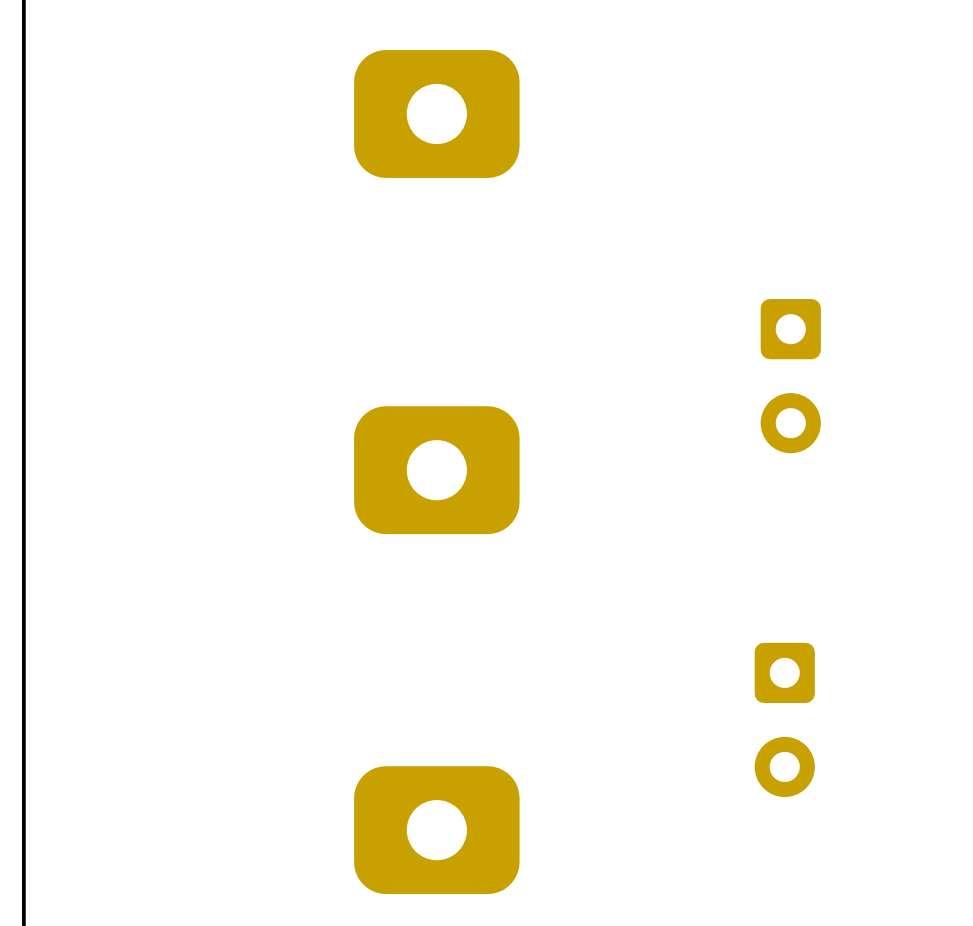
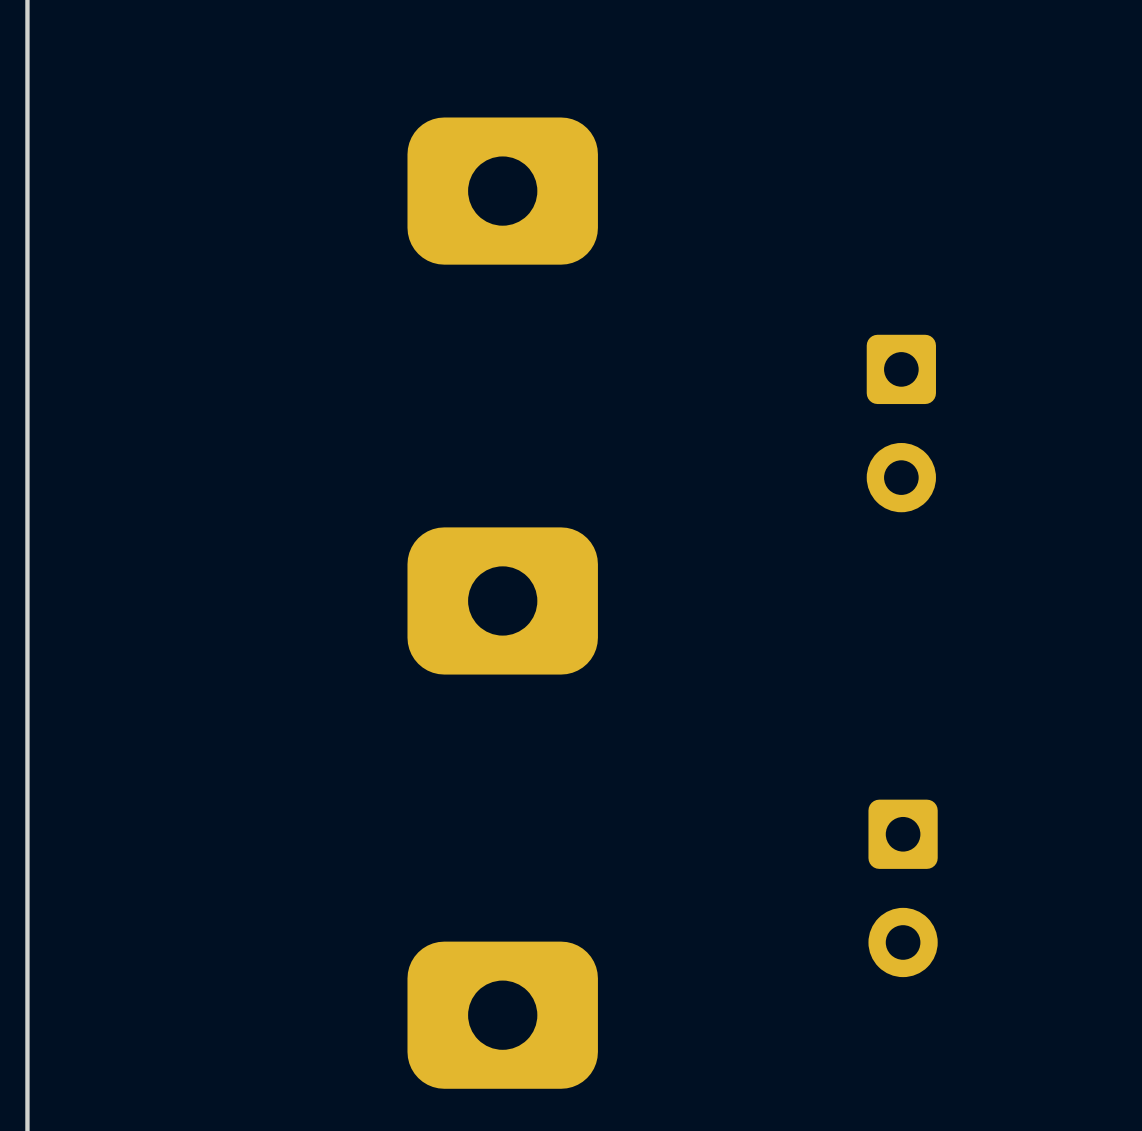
part position: (790, 376) -> (901, 423)

